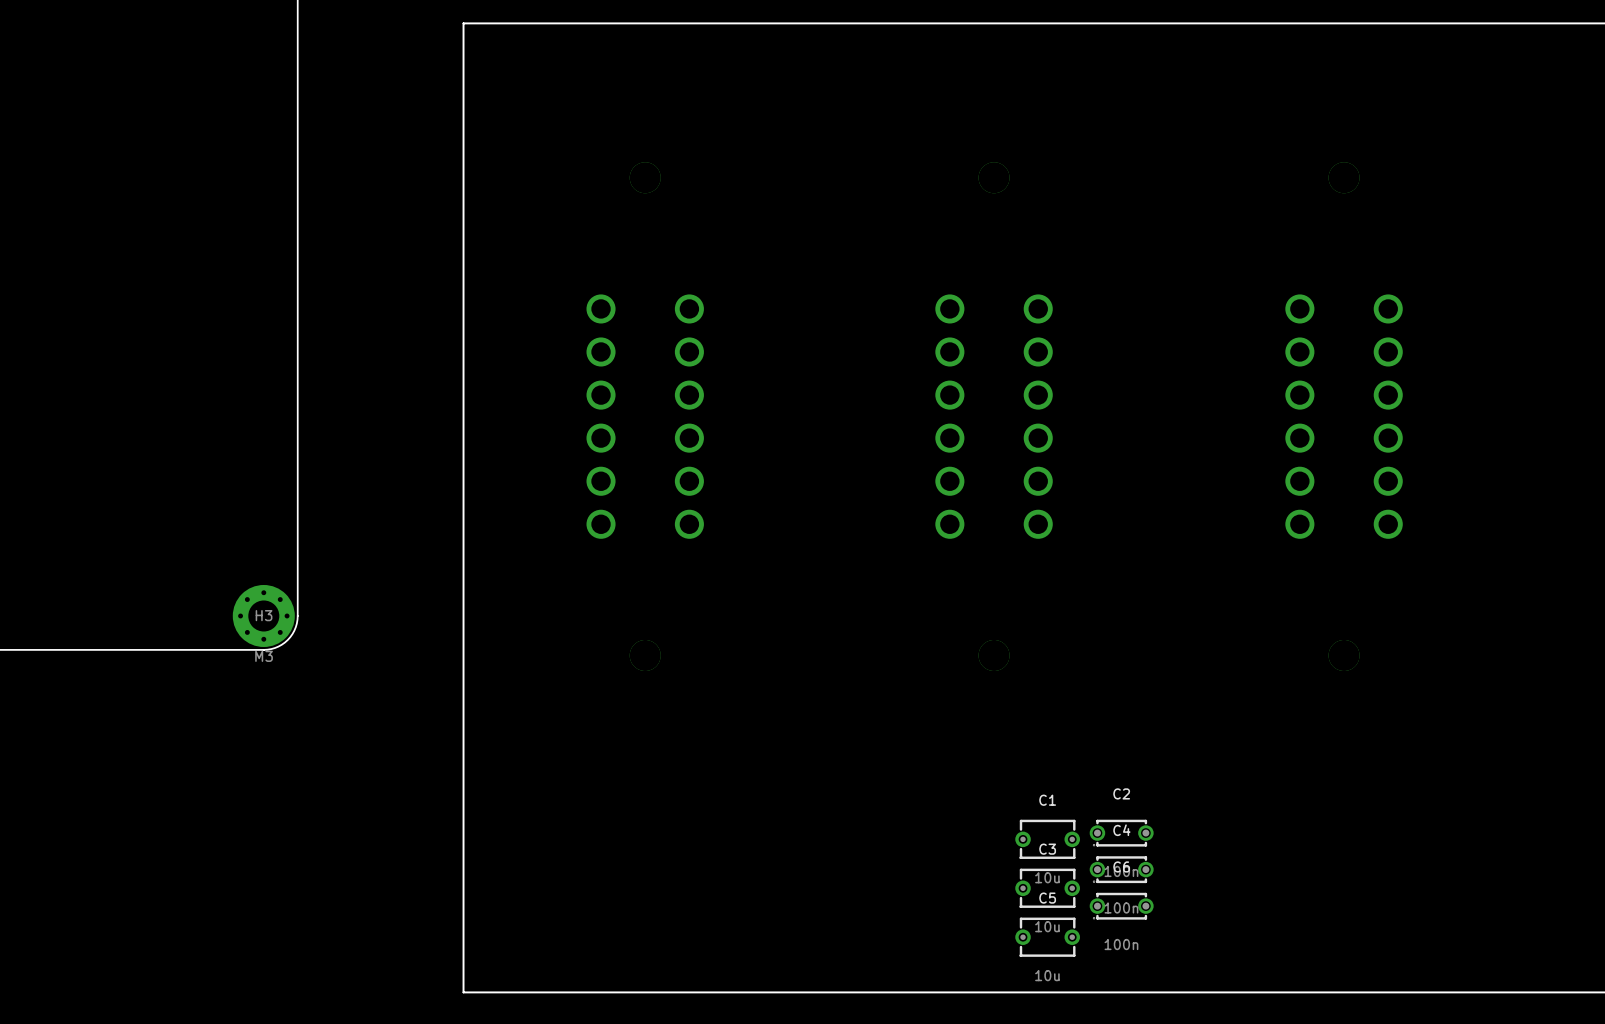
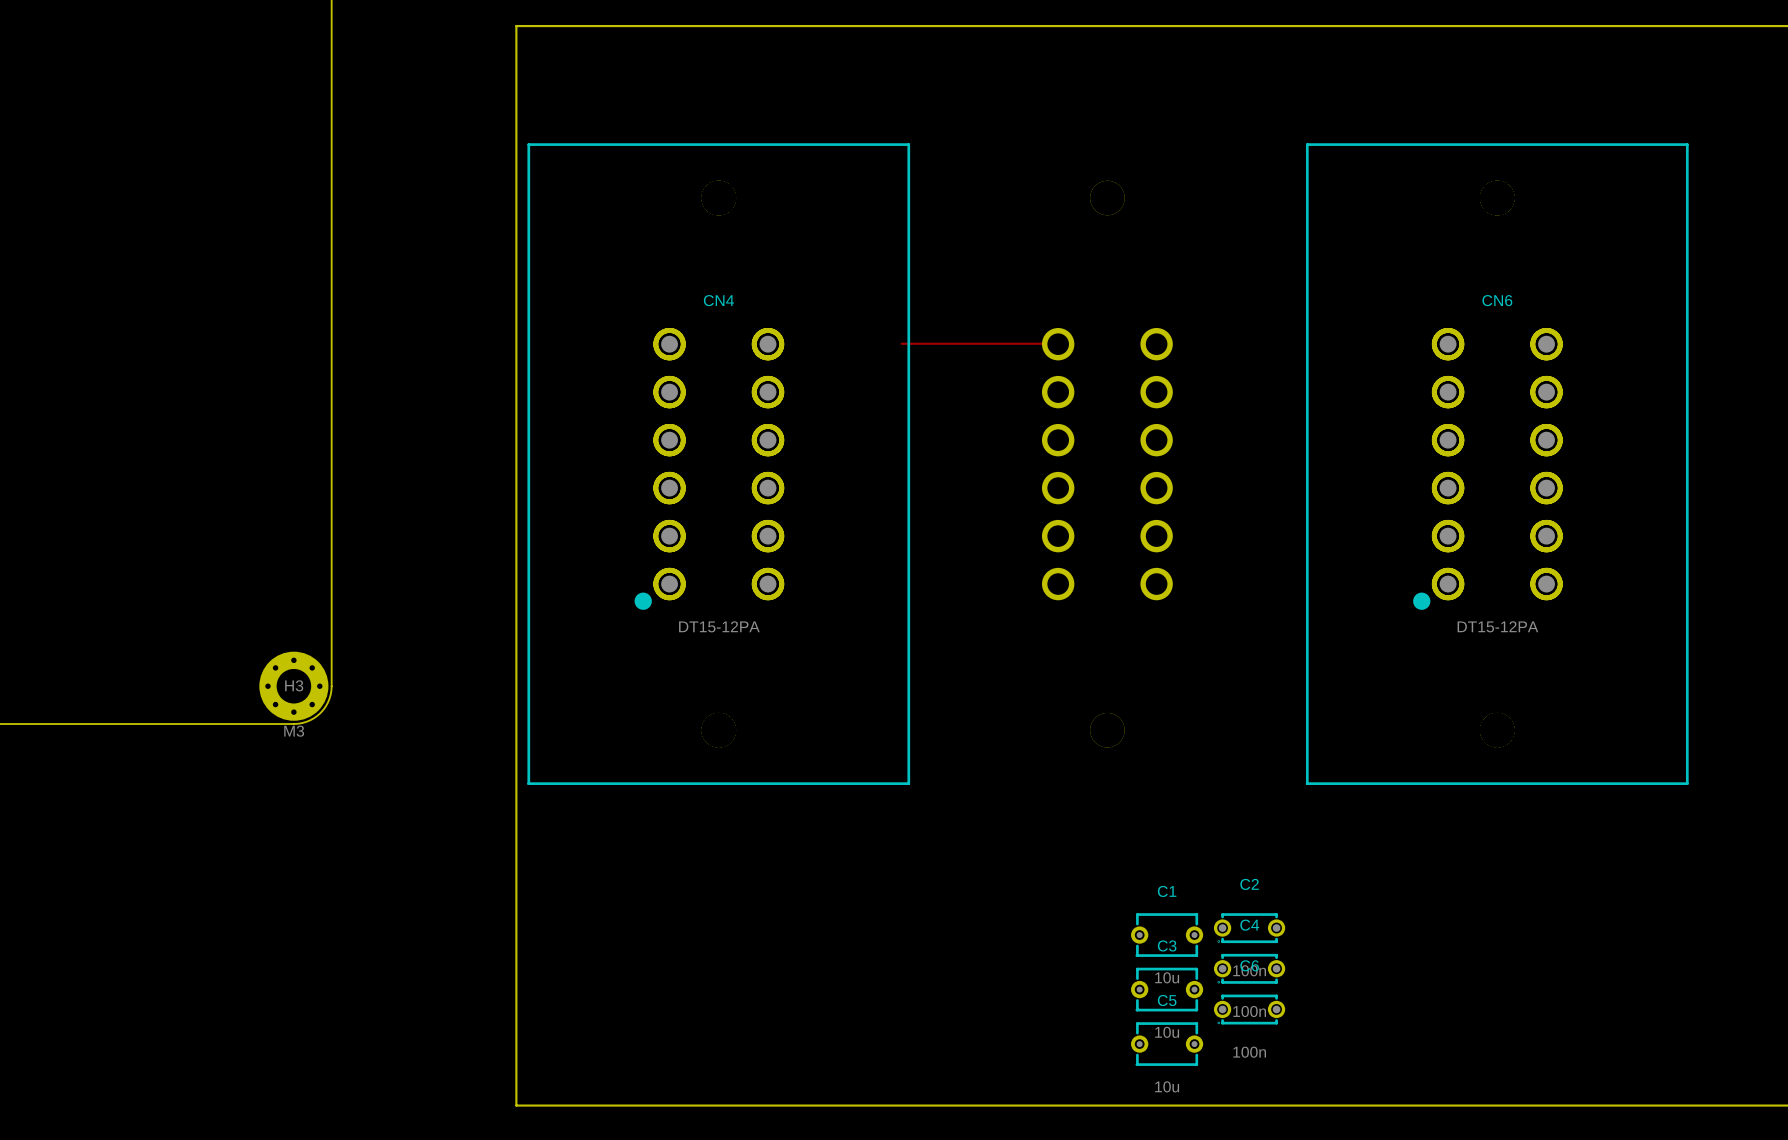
top track: none -> (901, 343) (1059, 343)
CN4: none -> DT15-12PA (718, 464)
CN6: none -> DT15-12PA (1497, 464)

